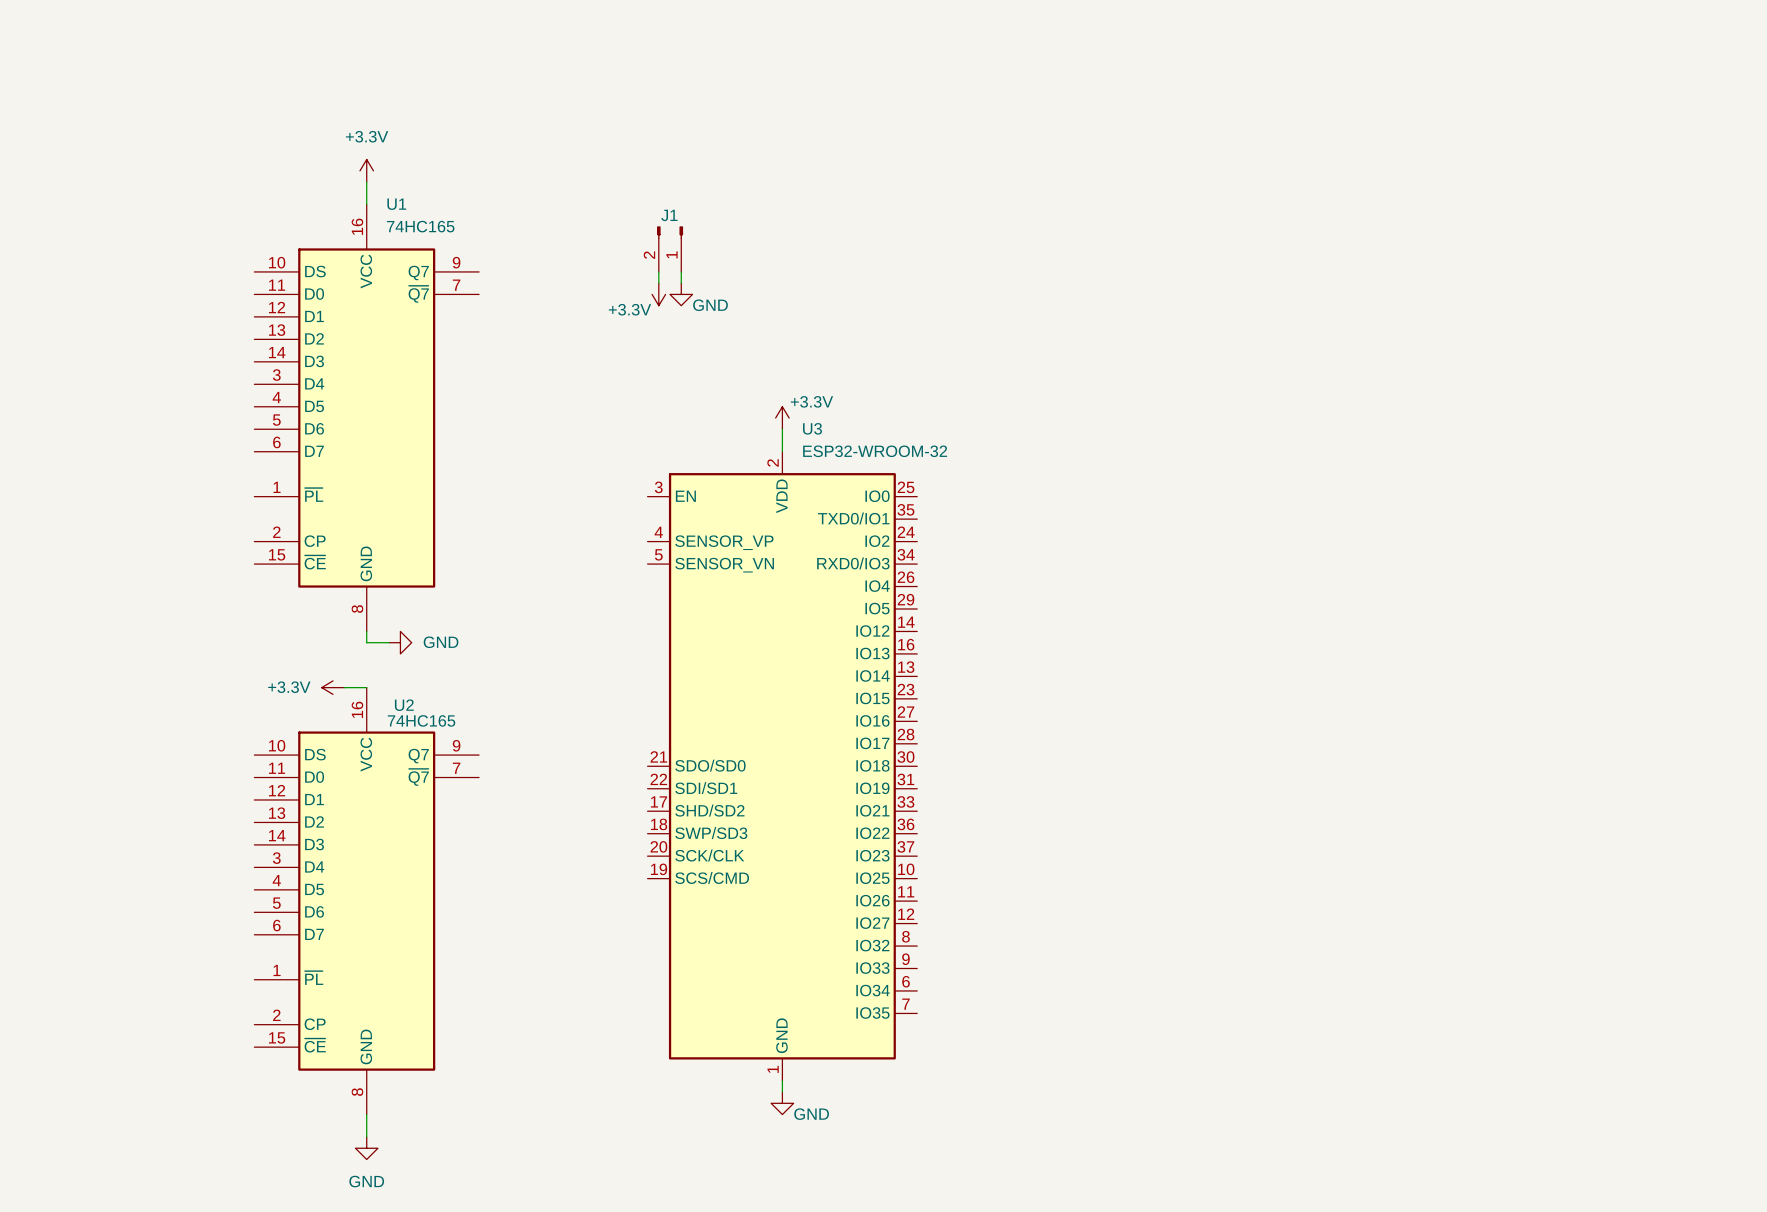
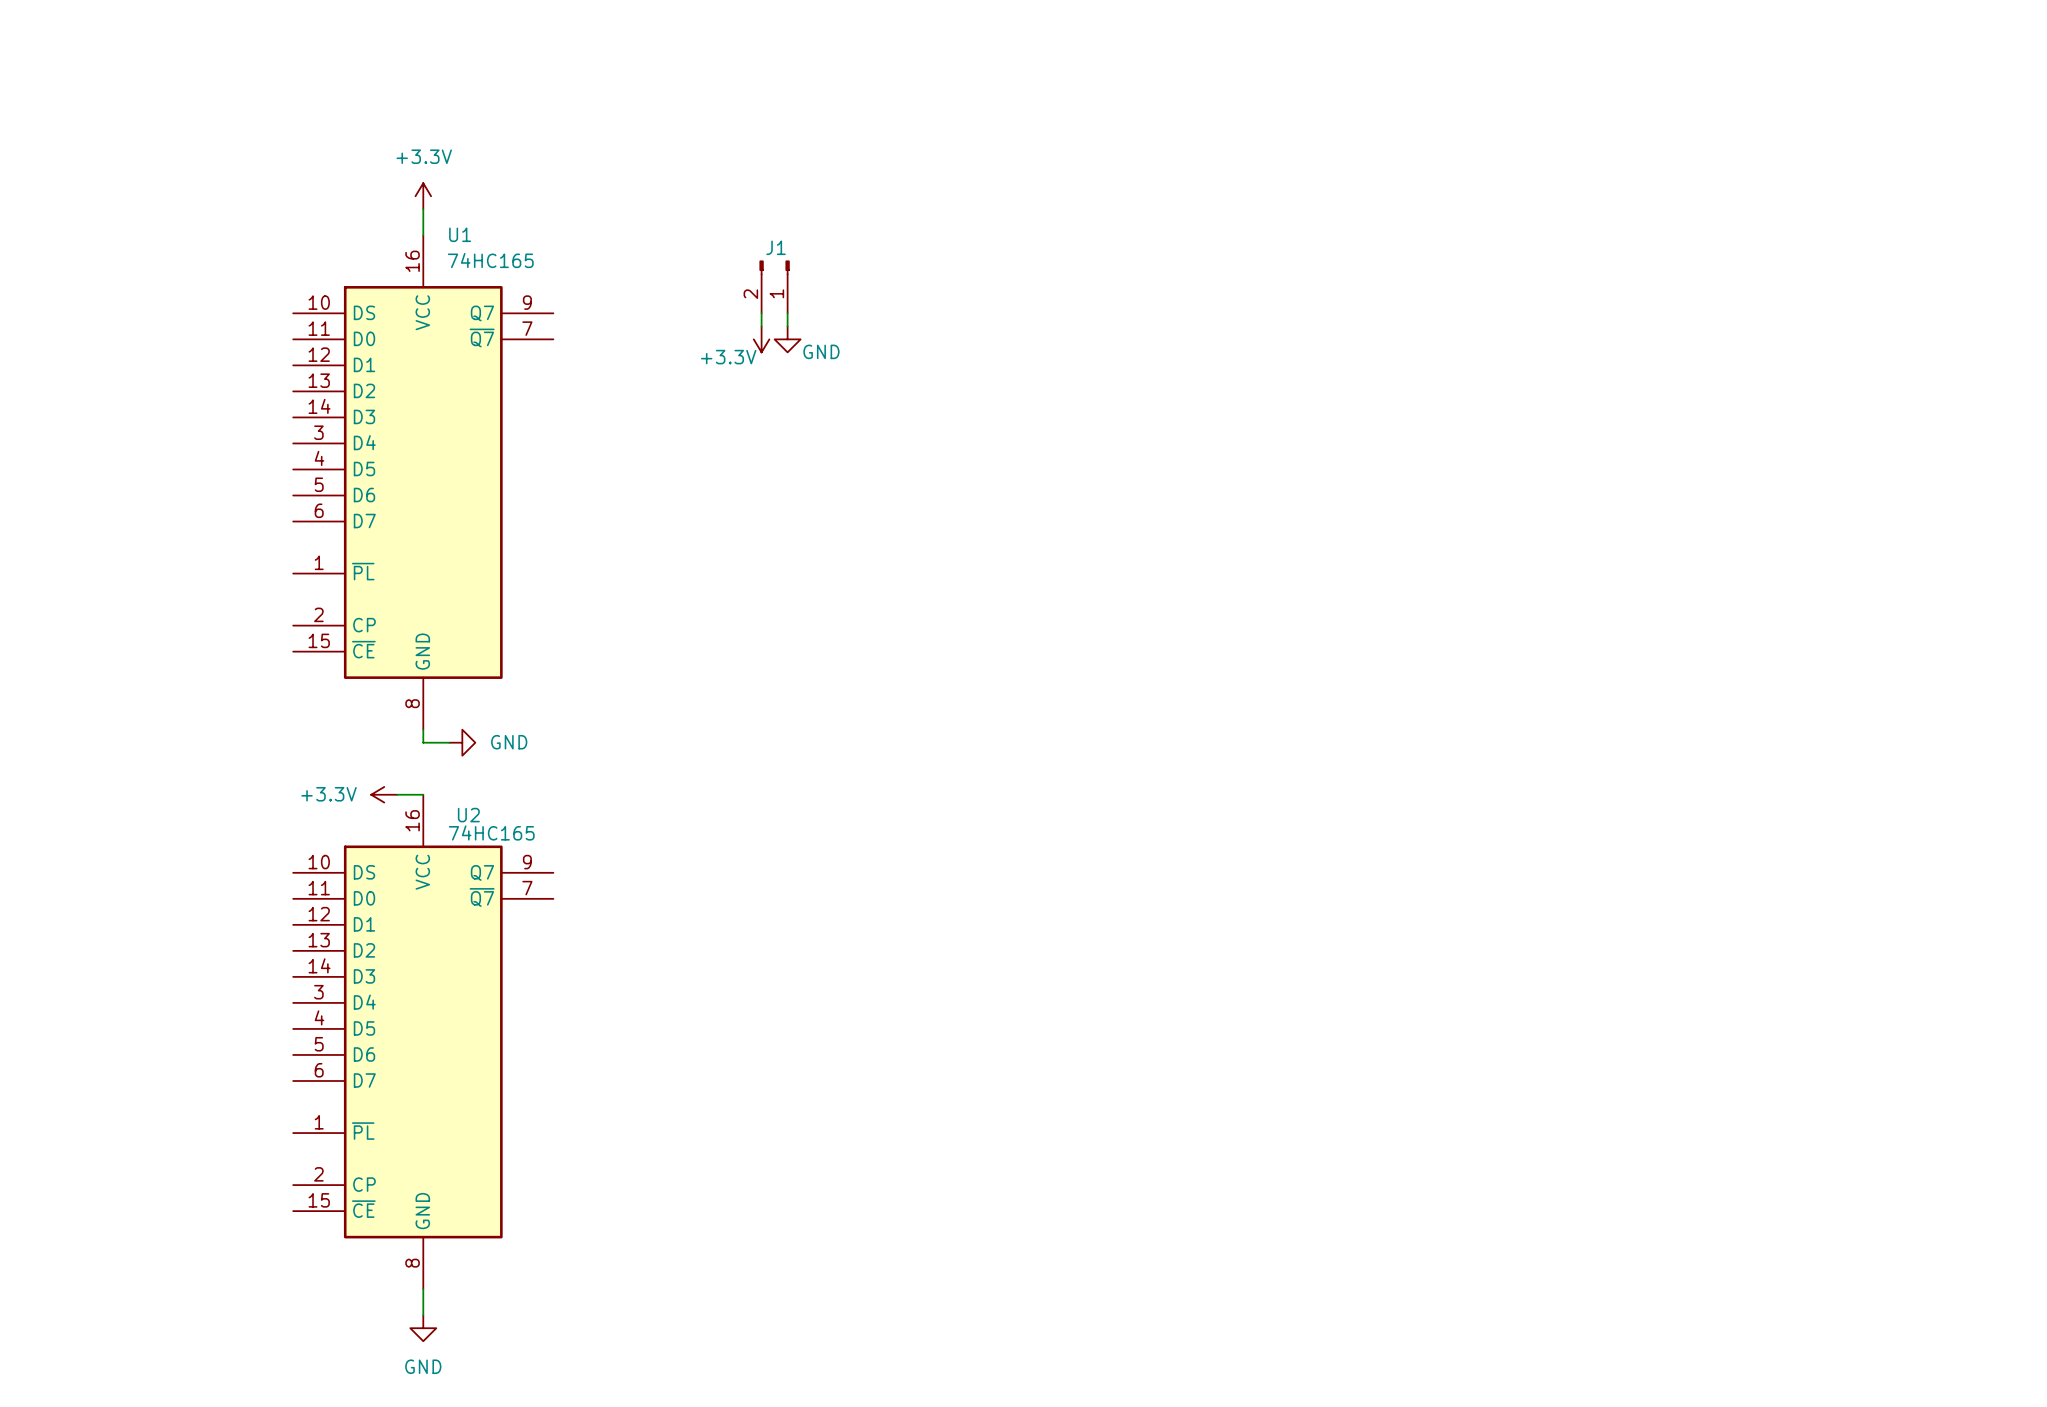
power symbol: +3.3V (782, 418) -> none
wire: (782, 429) (782, 451) -> none
U3: ESP32-WROOM-32 (782, 766) -> none
wire: (782, 1080) (782, 1092) -> none
power symbol: GND (782, 1103) -> none

